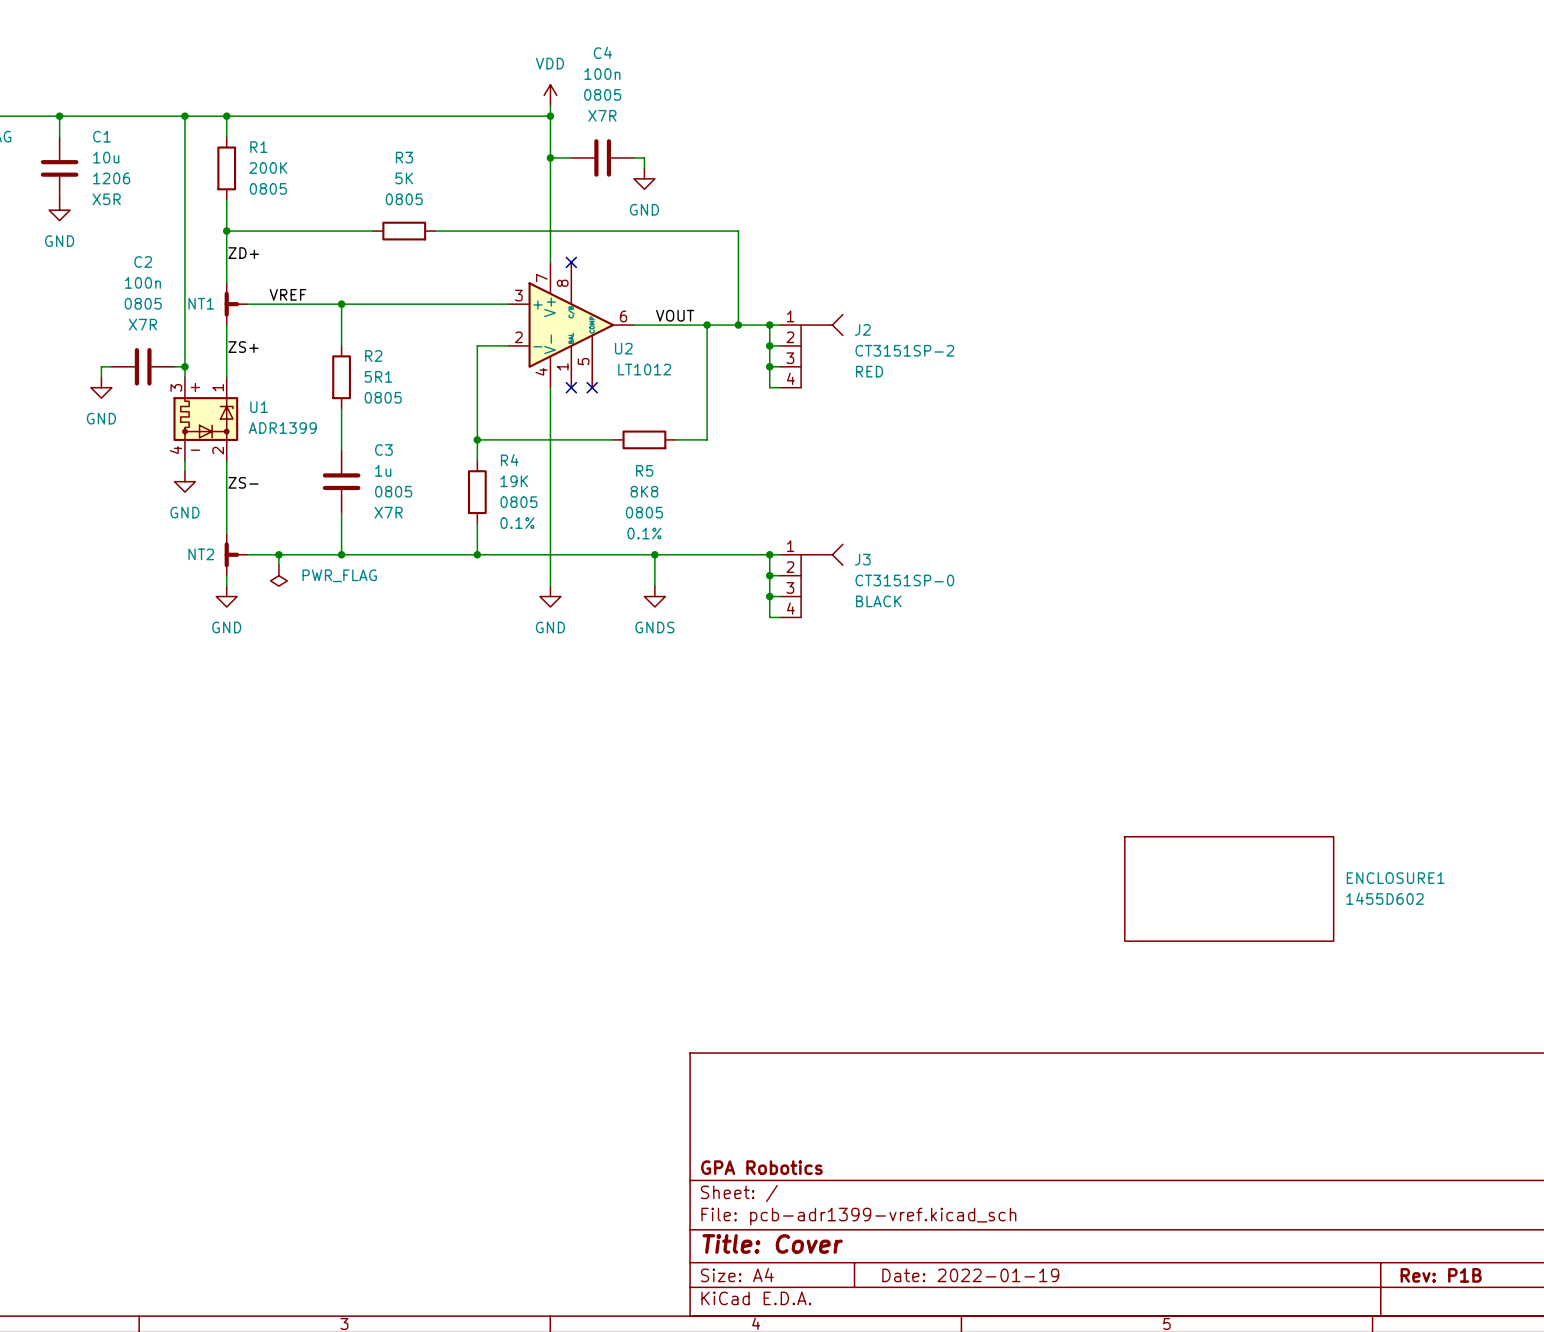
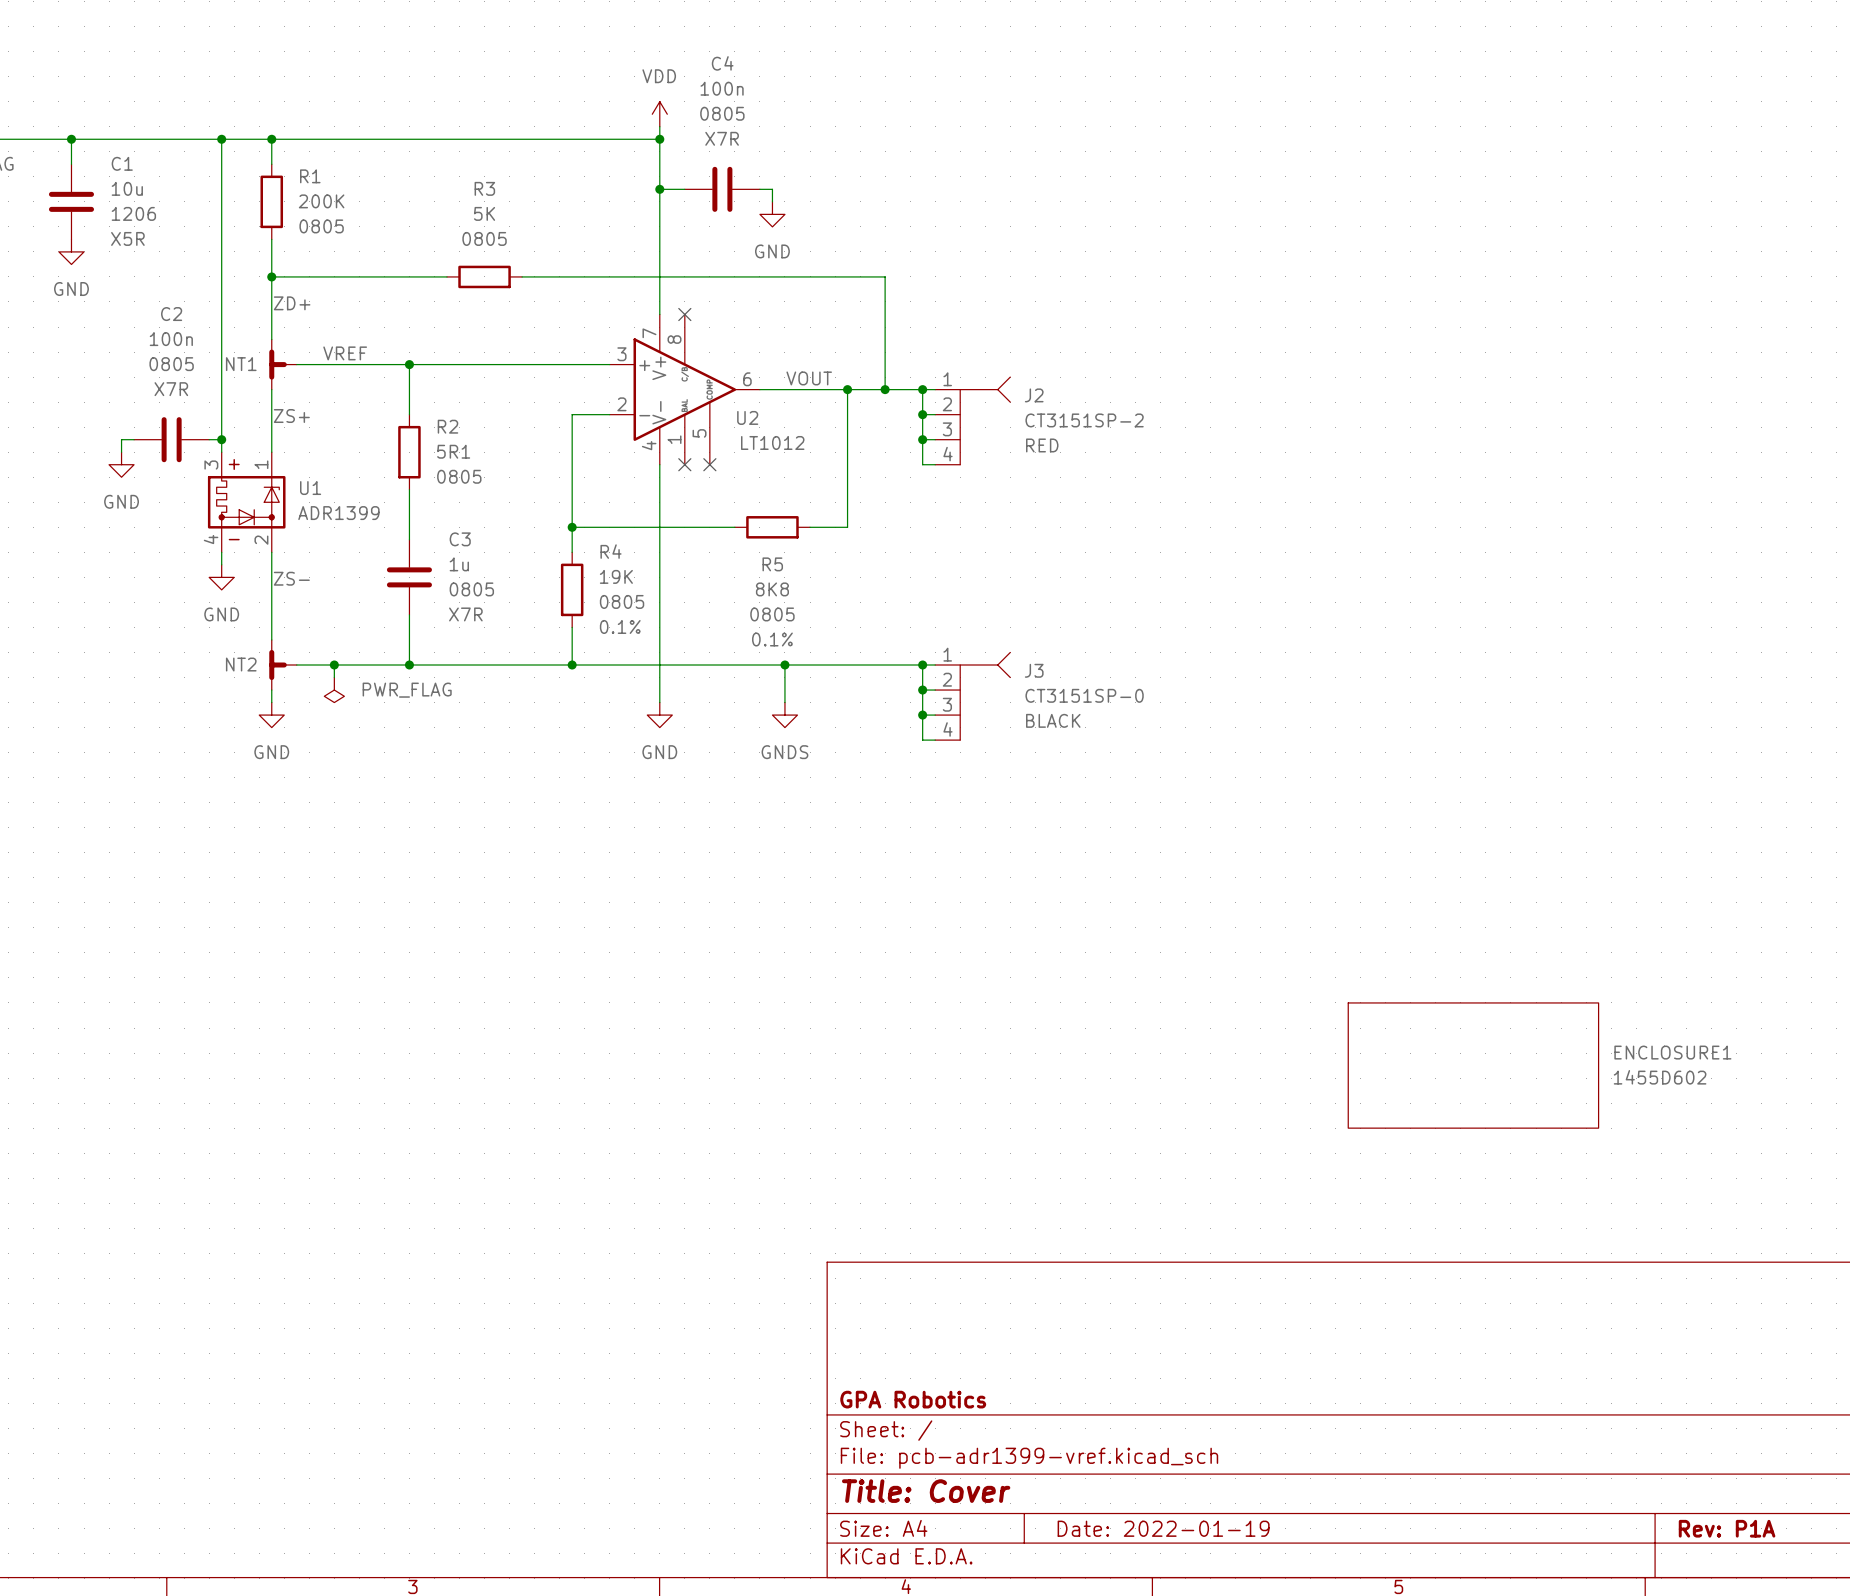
title block: Rev: P1B (1441, 1275) -> Rev: P1A (1727, 1528)

